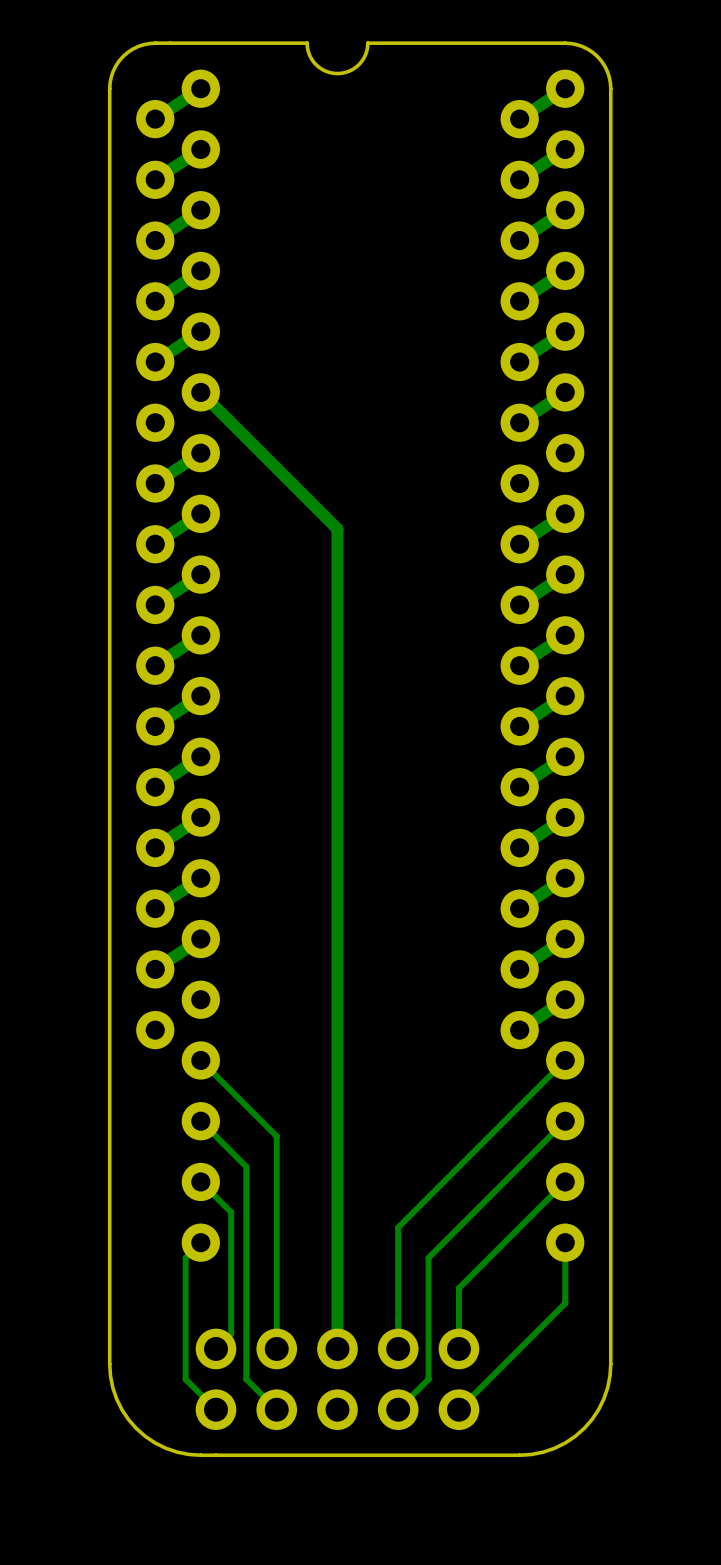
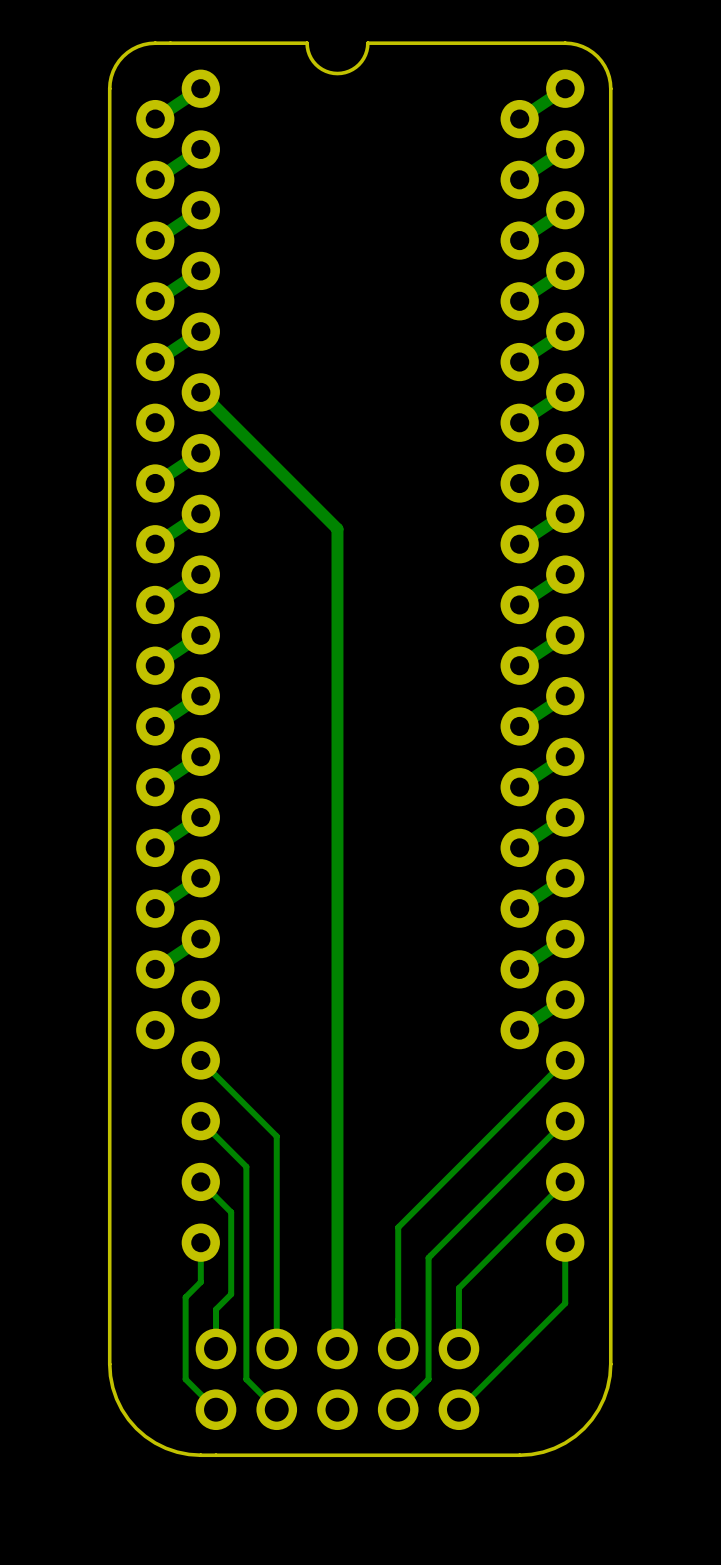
bottom track: (200, 1242) (185, 1257) (185, 1297) -> (200, 1242) (200, 1282) (185, 1297)
bottom track: (231, 1294) (231, 1333) (216, 1348) -> (231, 1294) (216, 1309) (216, 1348)

